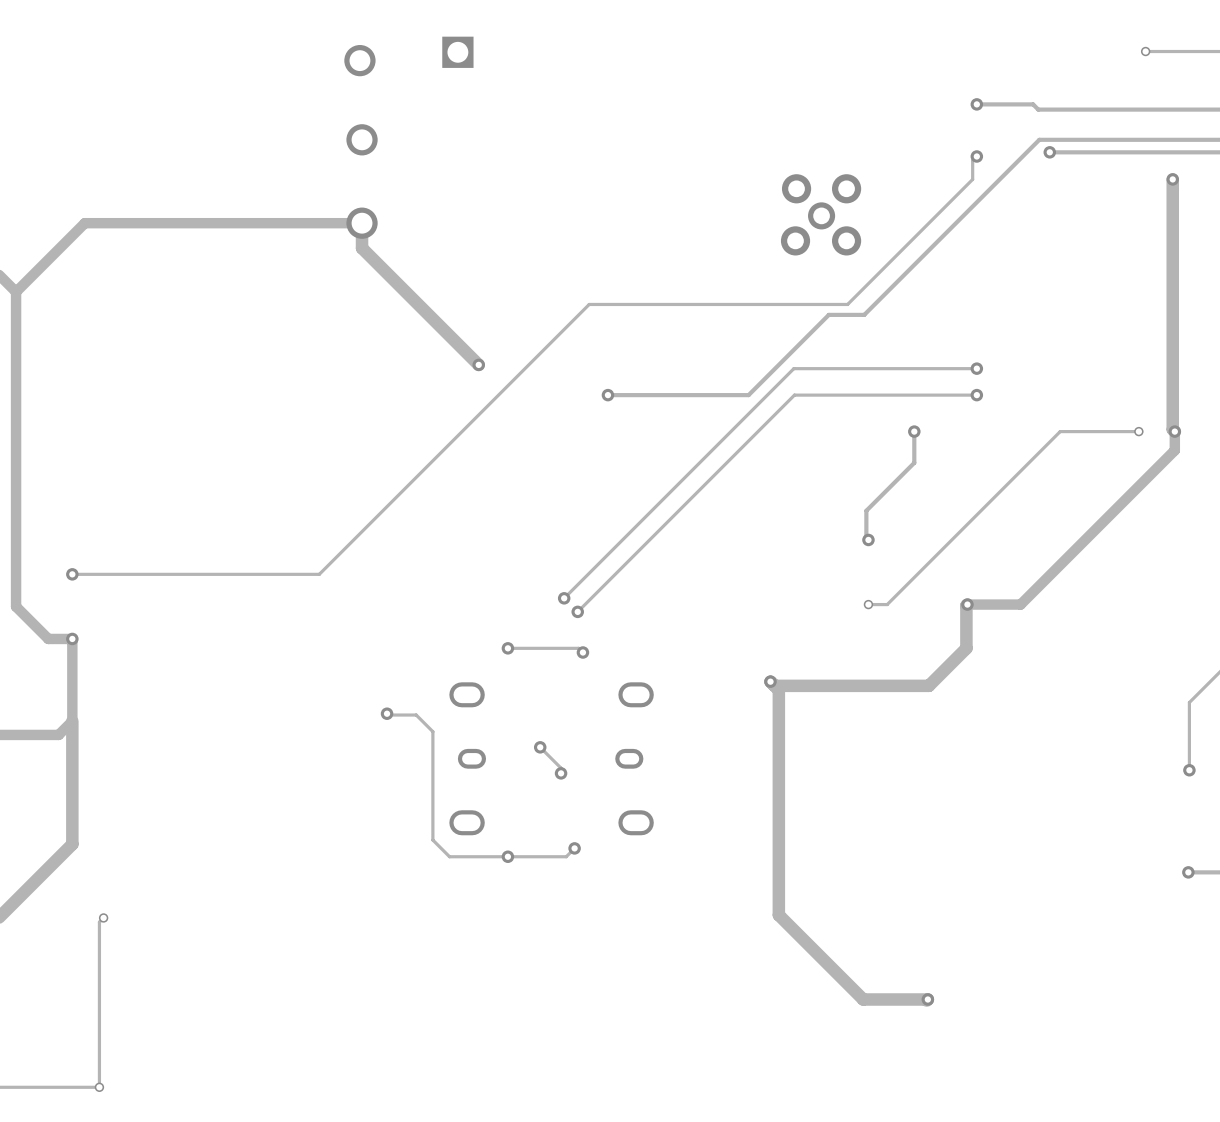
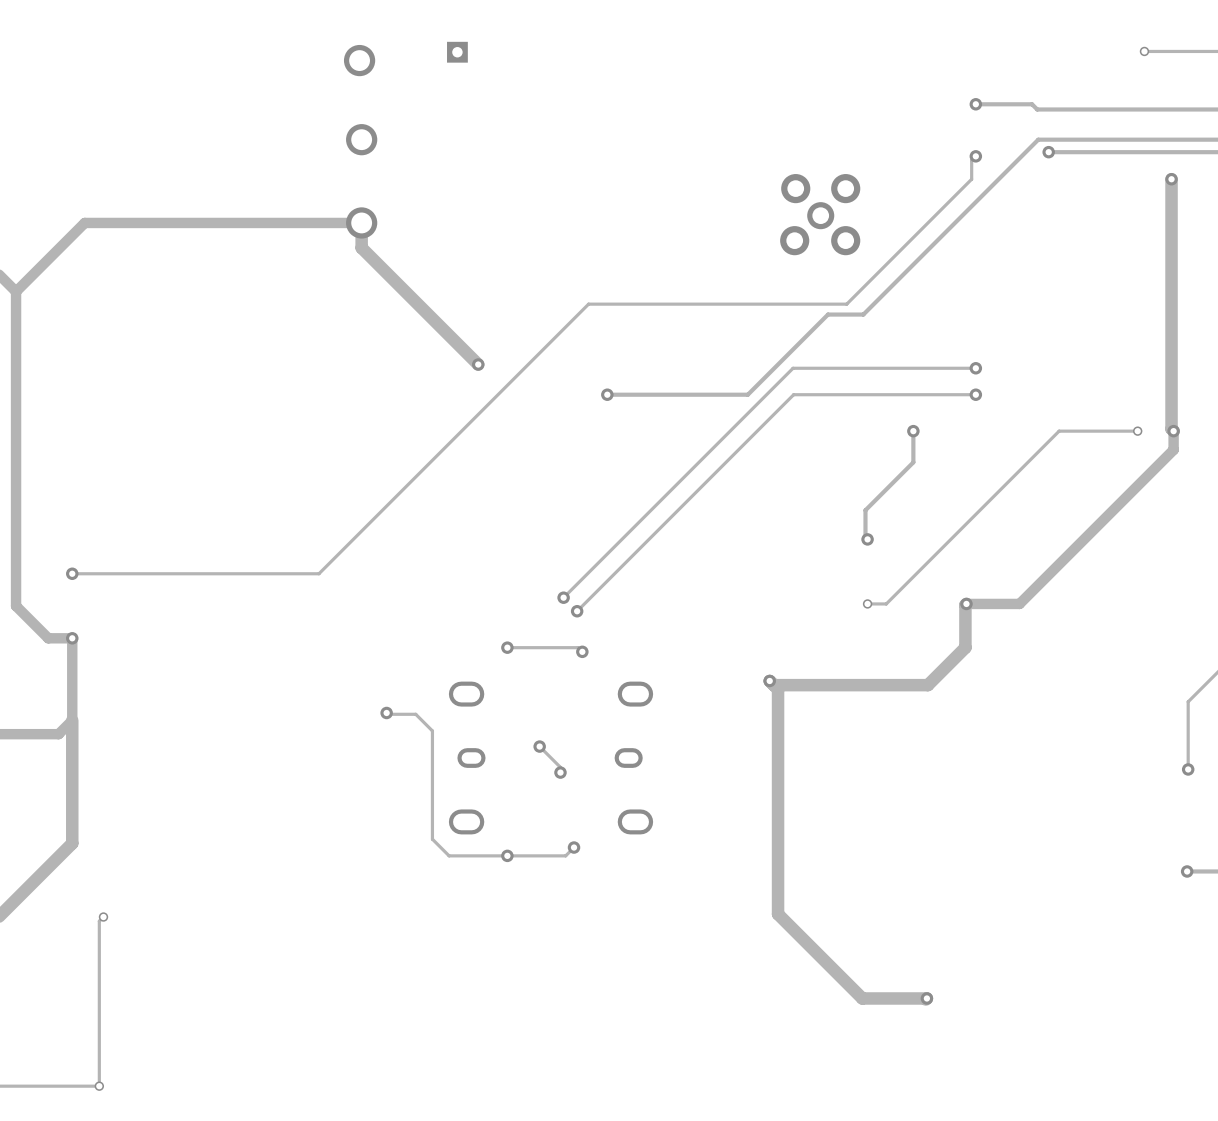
part footprint: [442, 36, 474, 68] -> [447, 41, 468, 63]

